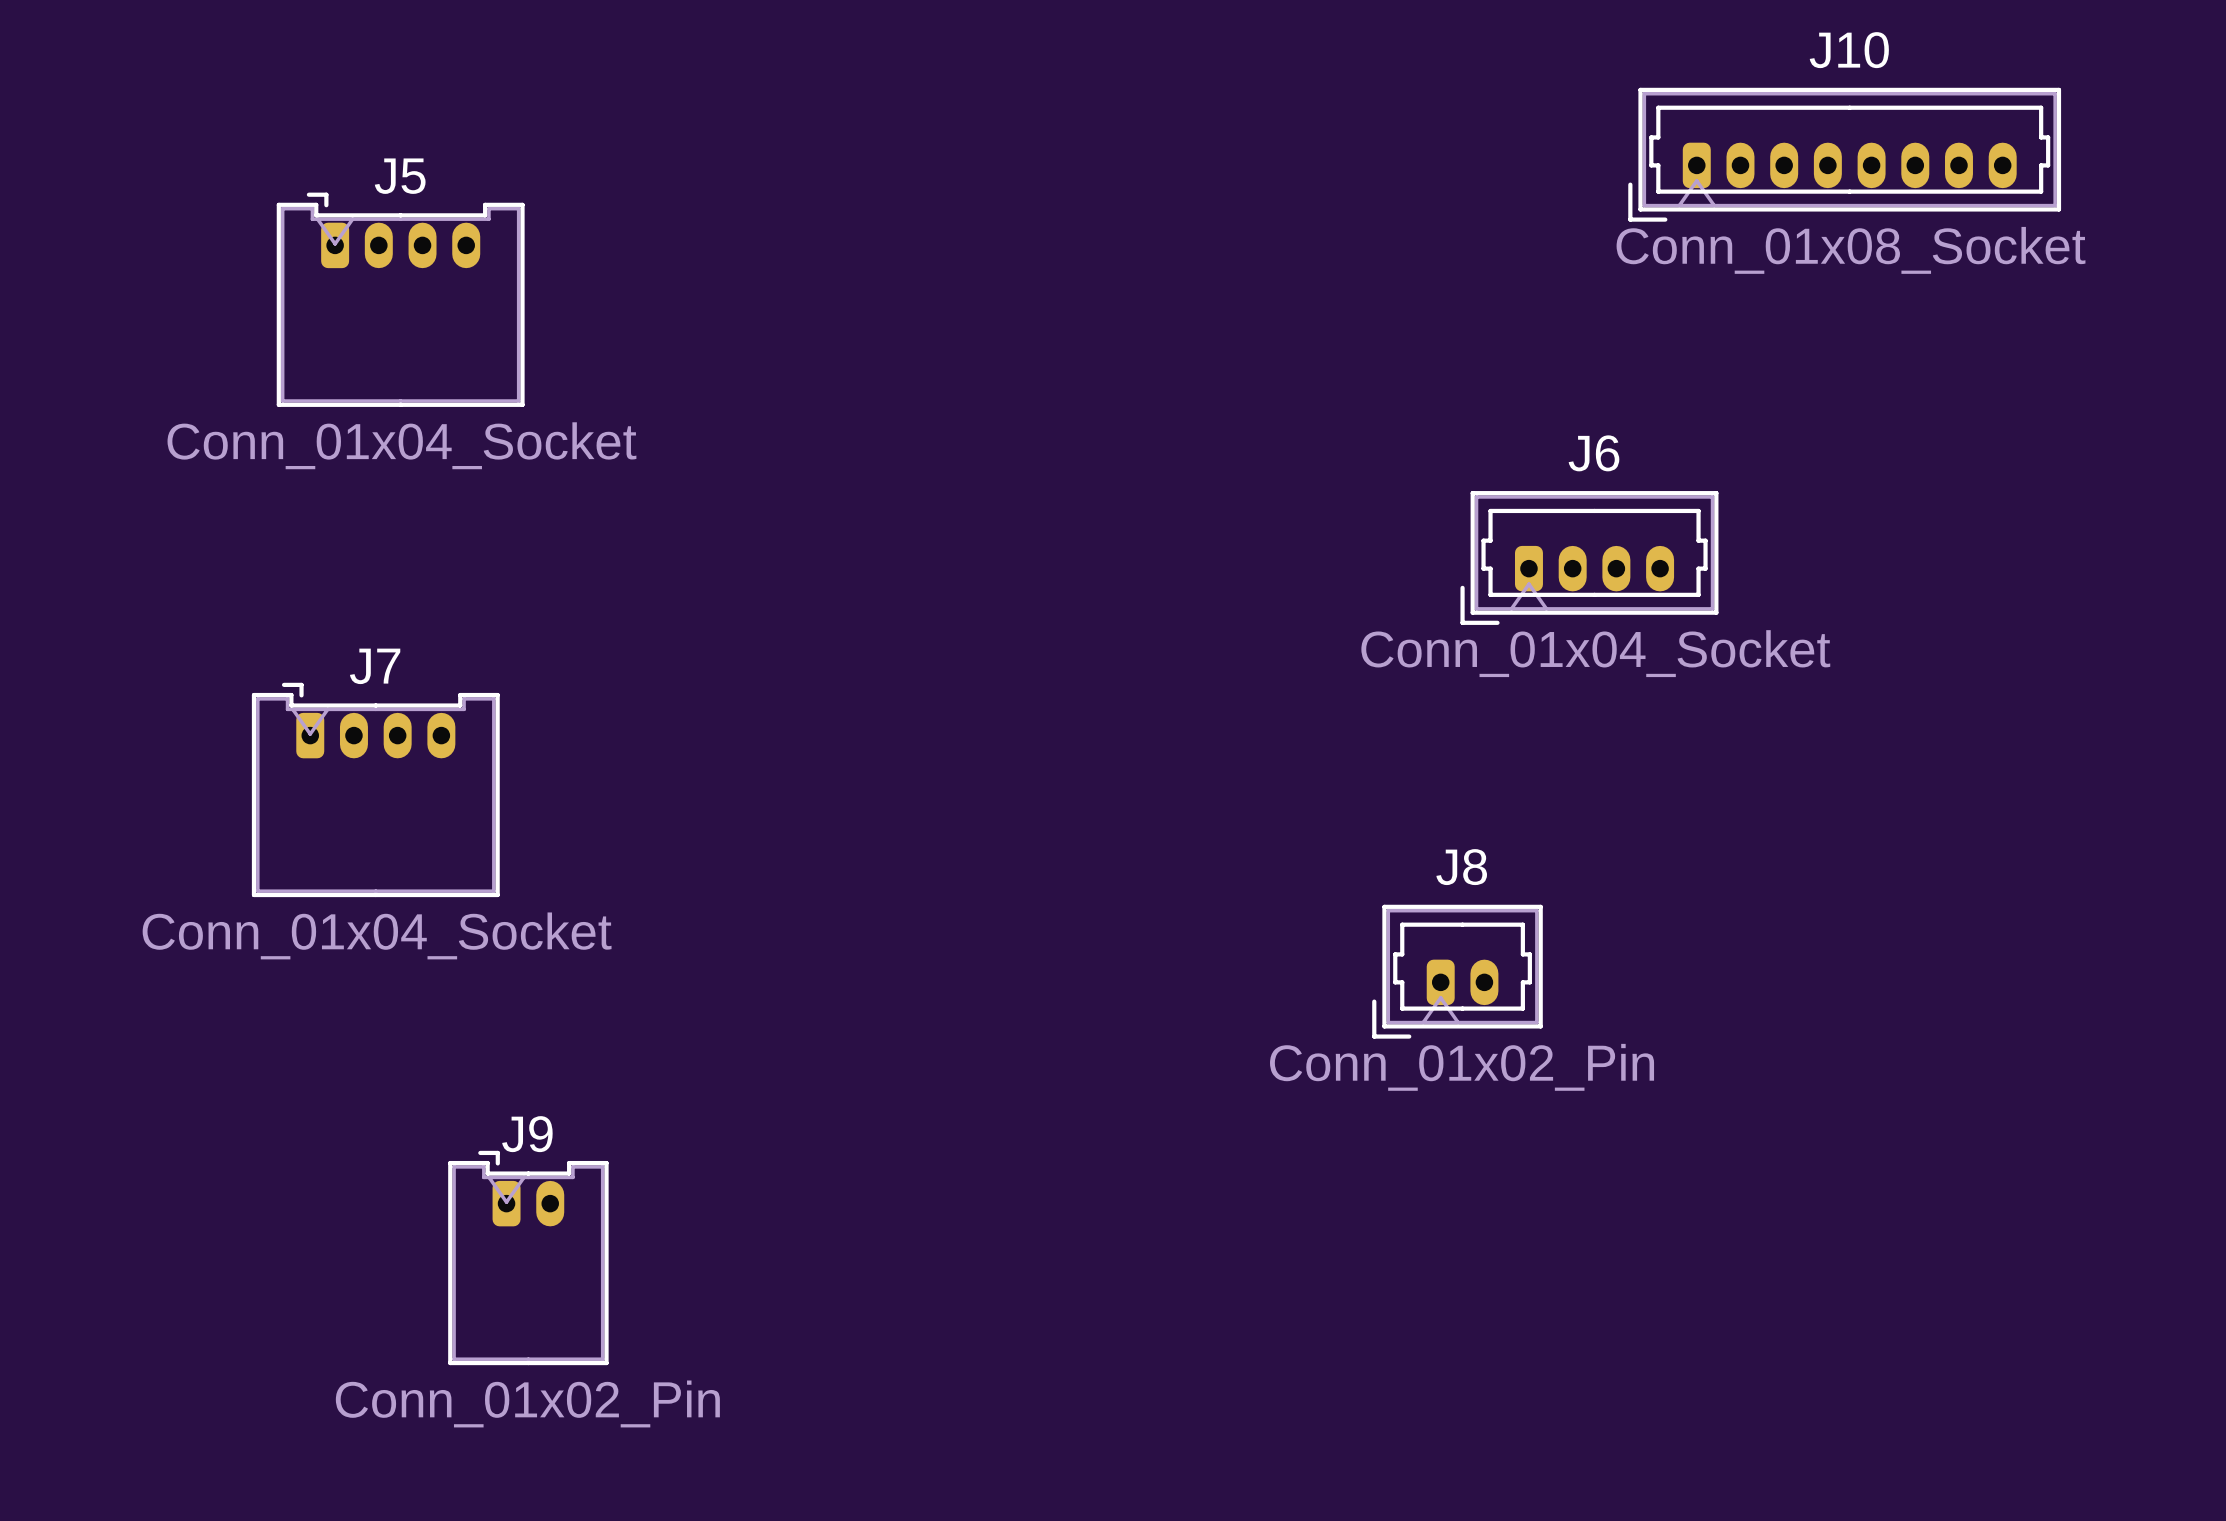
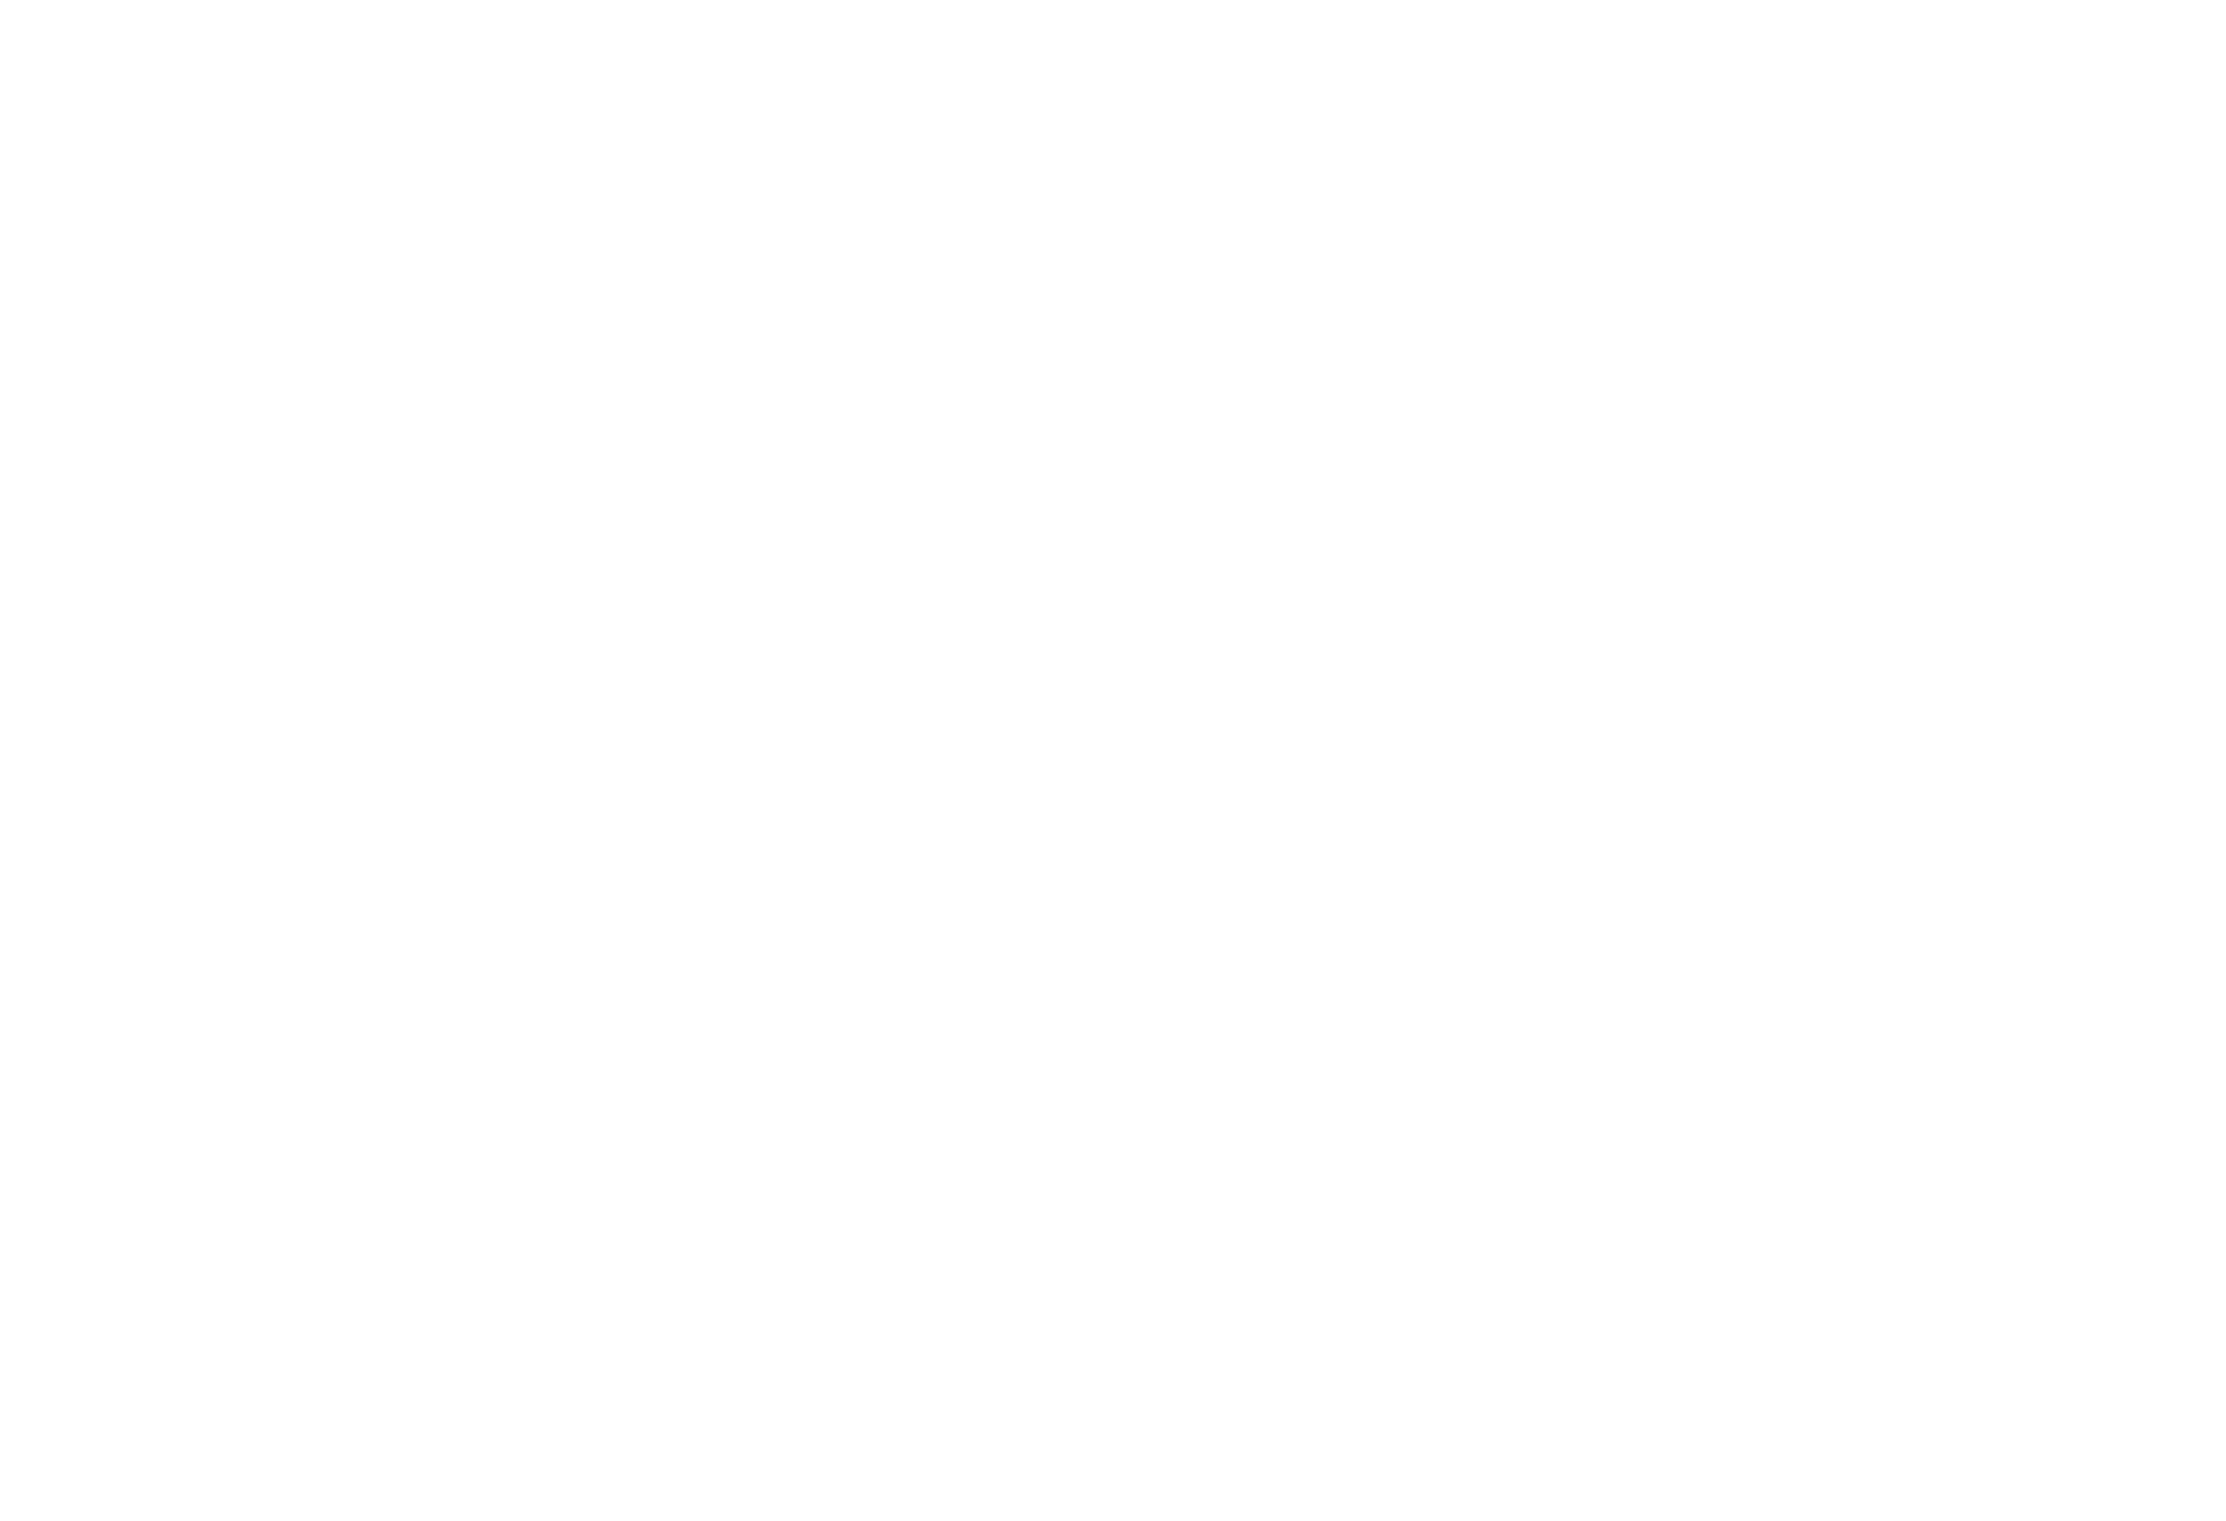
J10: Conn_01x08_Socket (1844, 154) -> none
J5: Conn_01x04_Socket (400, 299) -> none
J6: Conn_01x04_Socket (1589, 557) -> none
J7: Conn_01x04_Socket (375, 789) -> none
J8: Conn_01x02_Pin (1457, 971) -> none
J9: Conn_01x02_Pin (528, 1257) -> none

